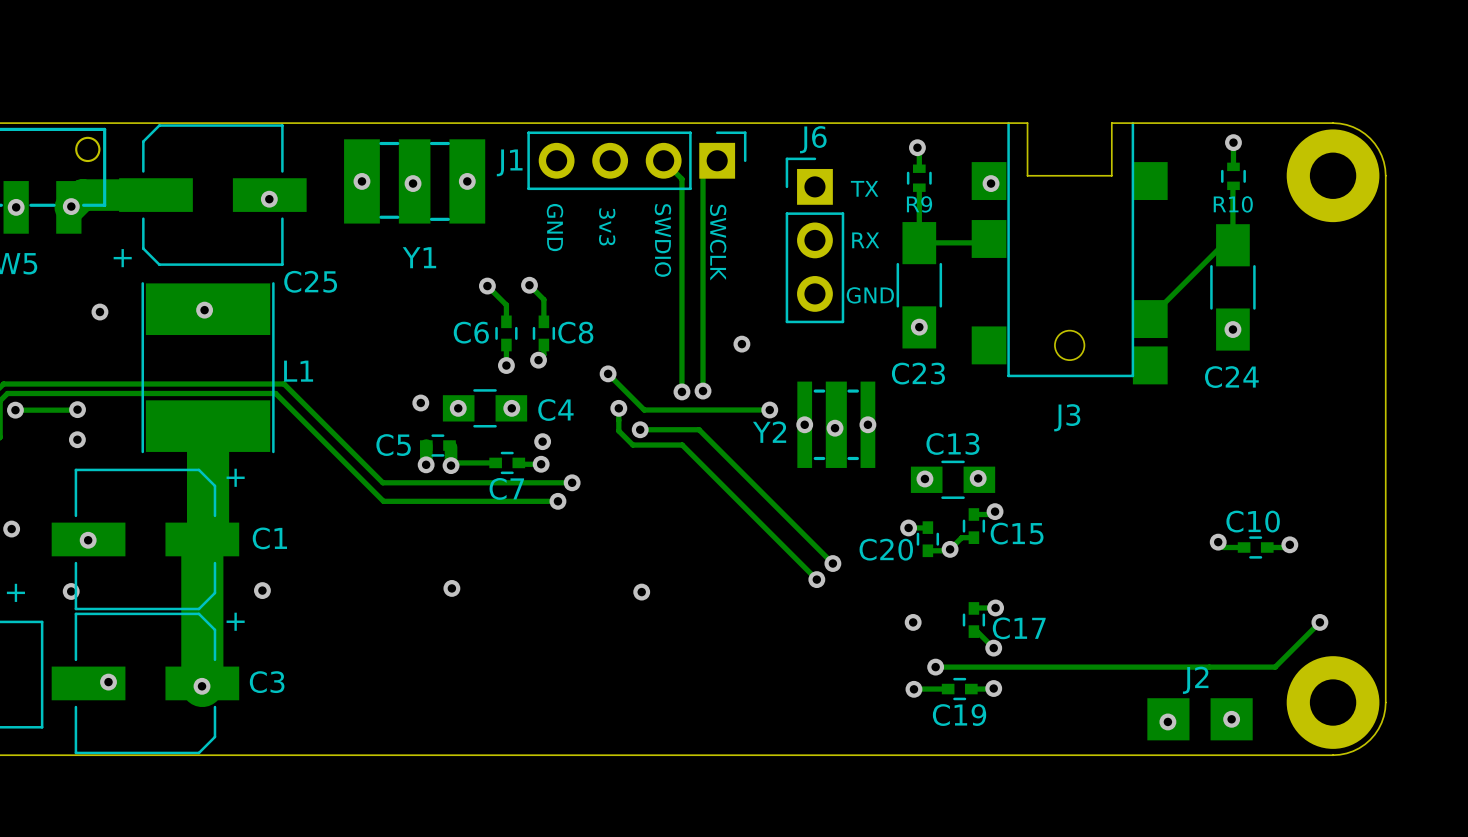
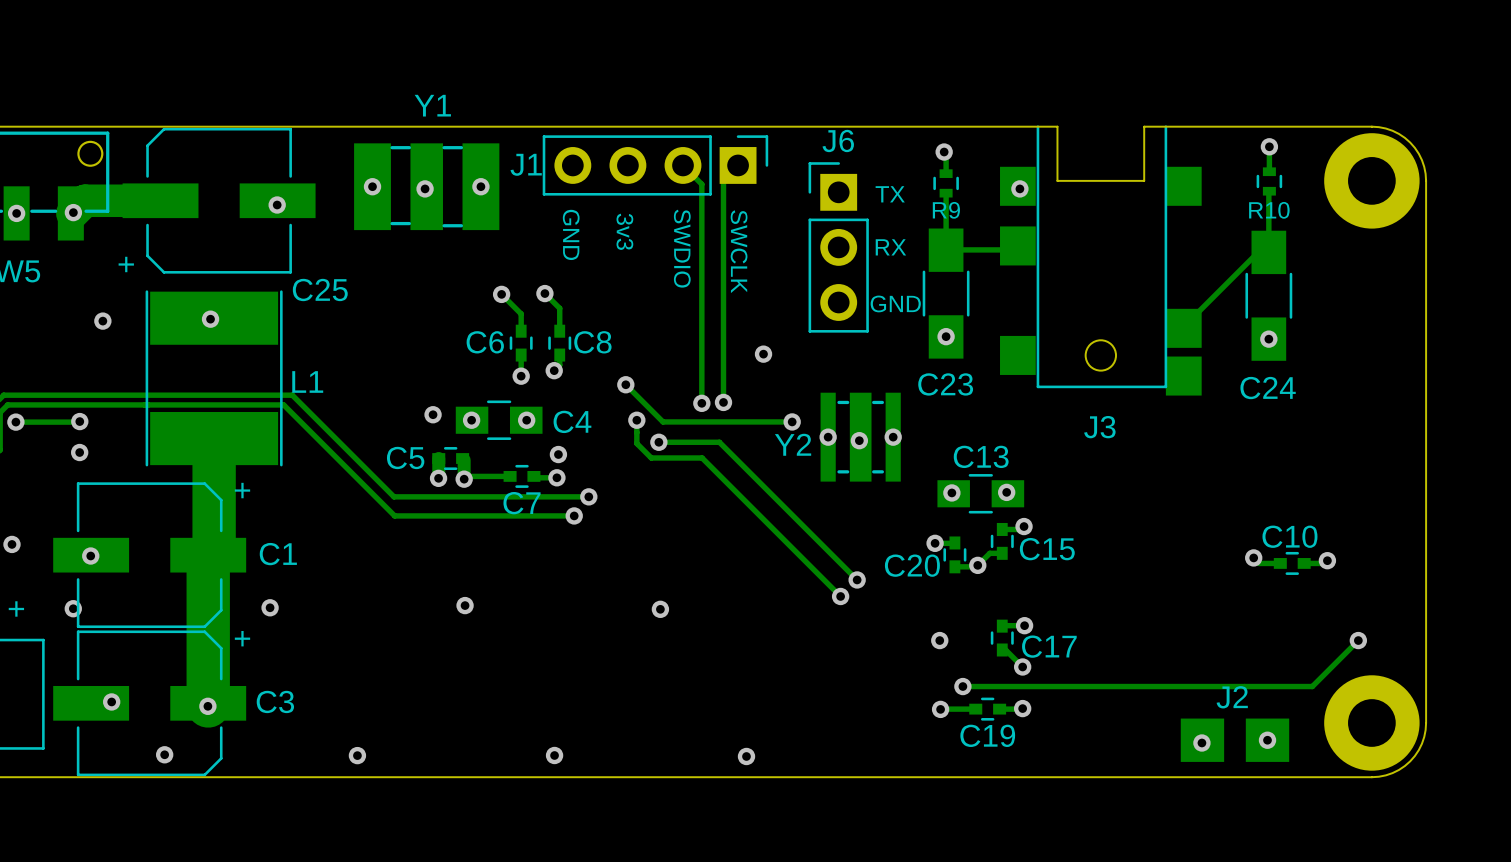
Y1 name position: Y1 (419, 257) -> Y1 (432, 105)
via: none -> (164, 754)
via: none -> (357, 755)
via: none -> (554, 755)
via: none -> (746, 756)

